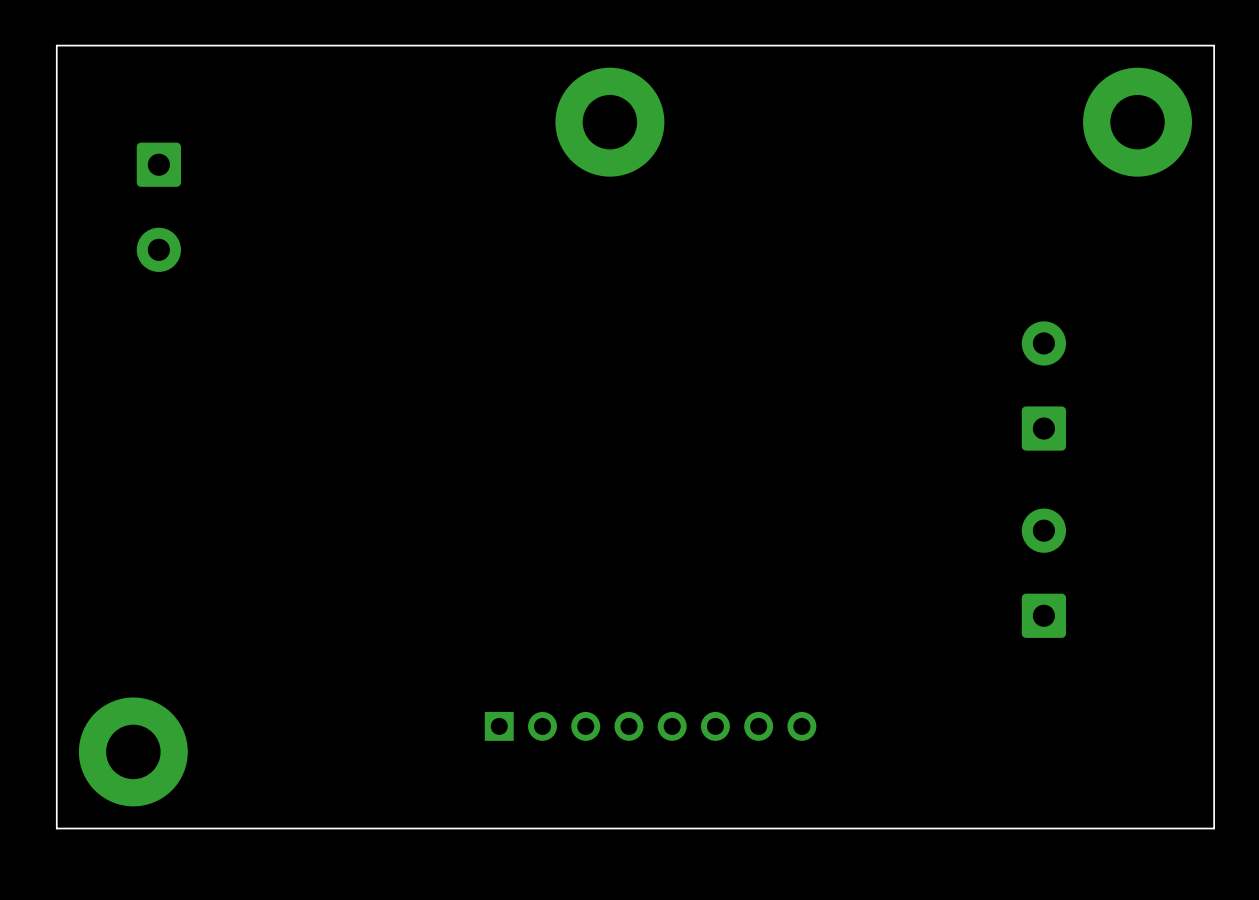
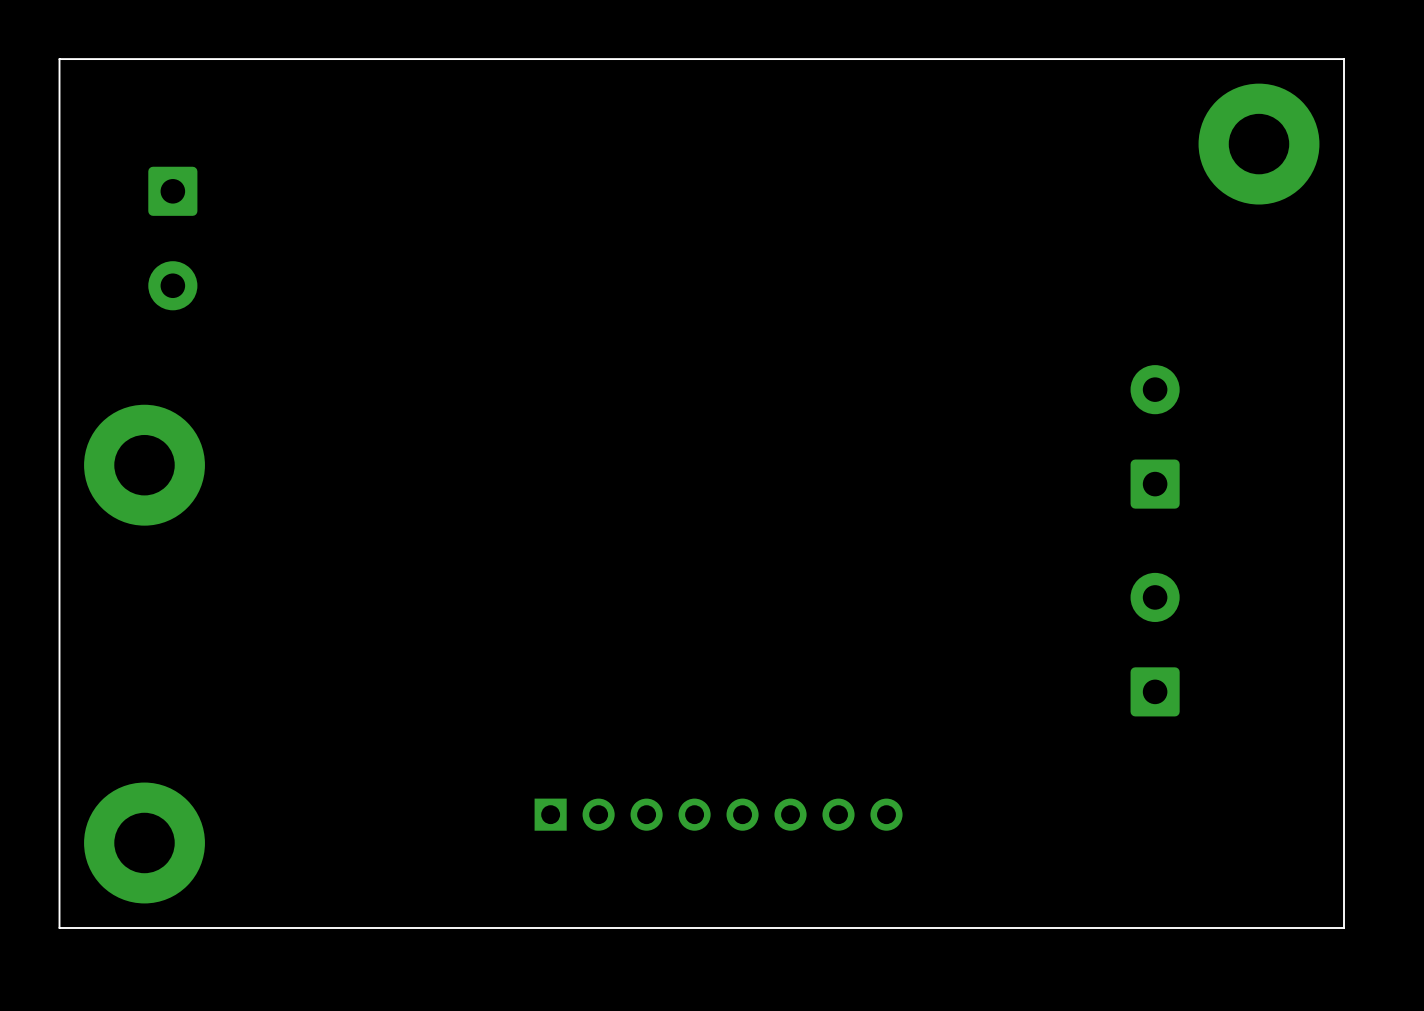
part: (609, 122) -> none
part: none -> (144, 465)

